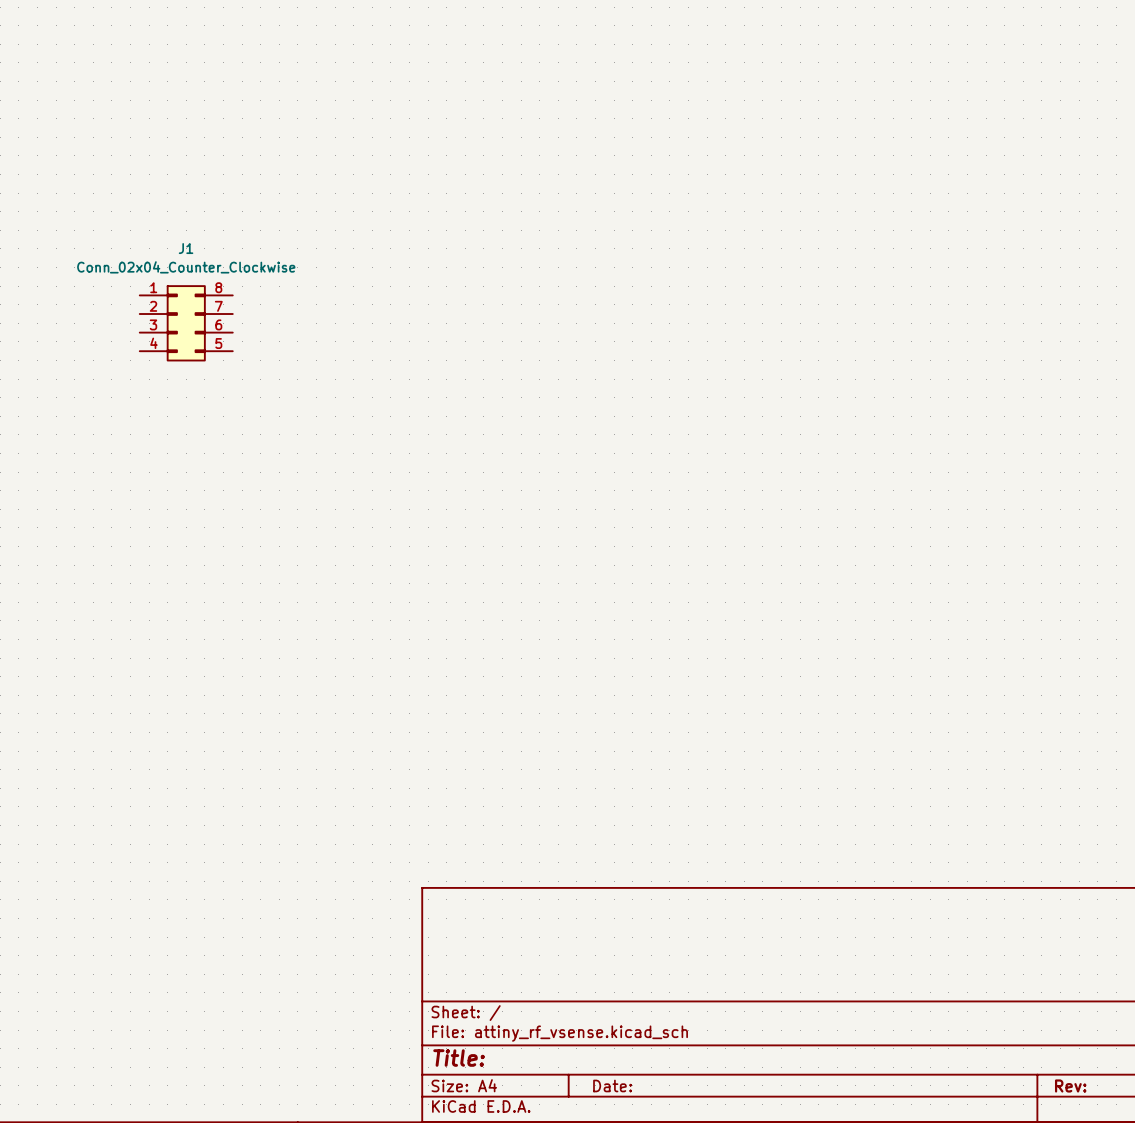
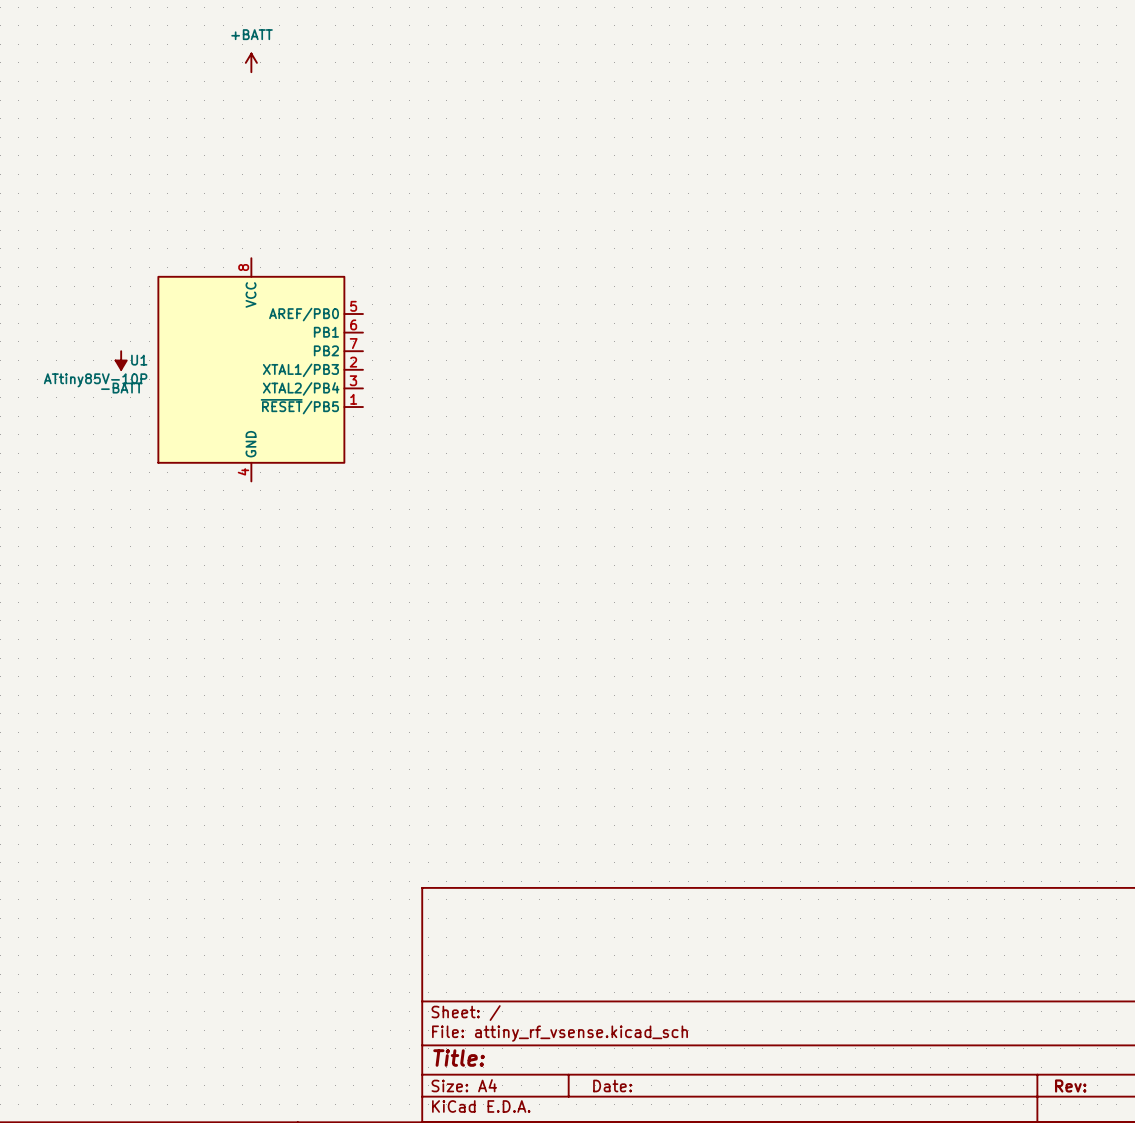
power symbol: none -> +BATT (251, 62)
J1: Conn_02x04_Counter_Clockwise (186, 323) -> none
power symbol: none -> -BATT (121, 360)
U1: none -> ATtiny85V-10P (260, 369)

